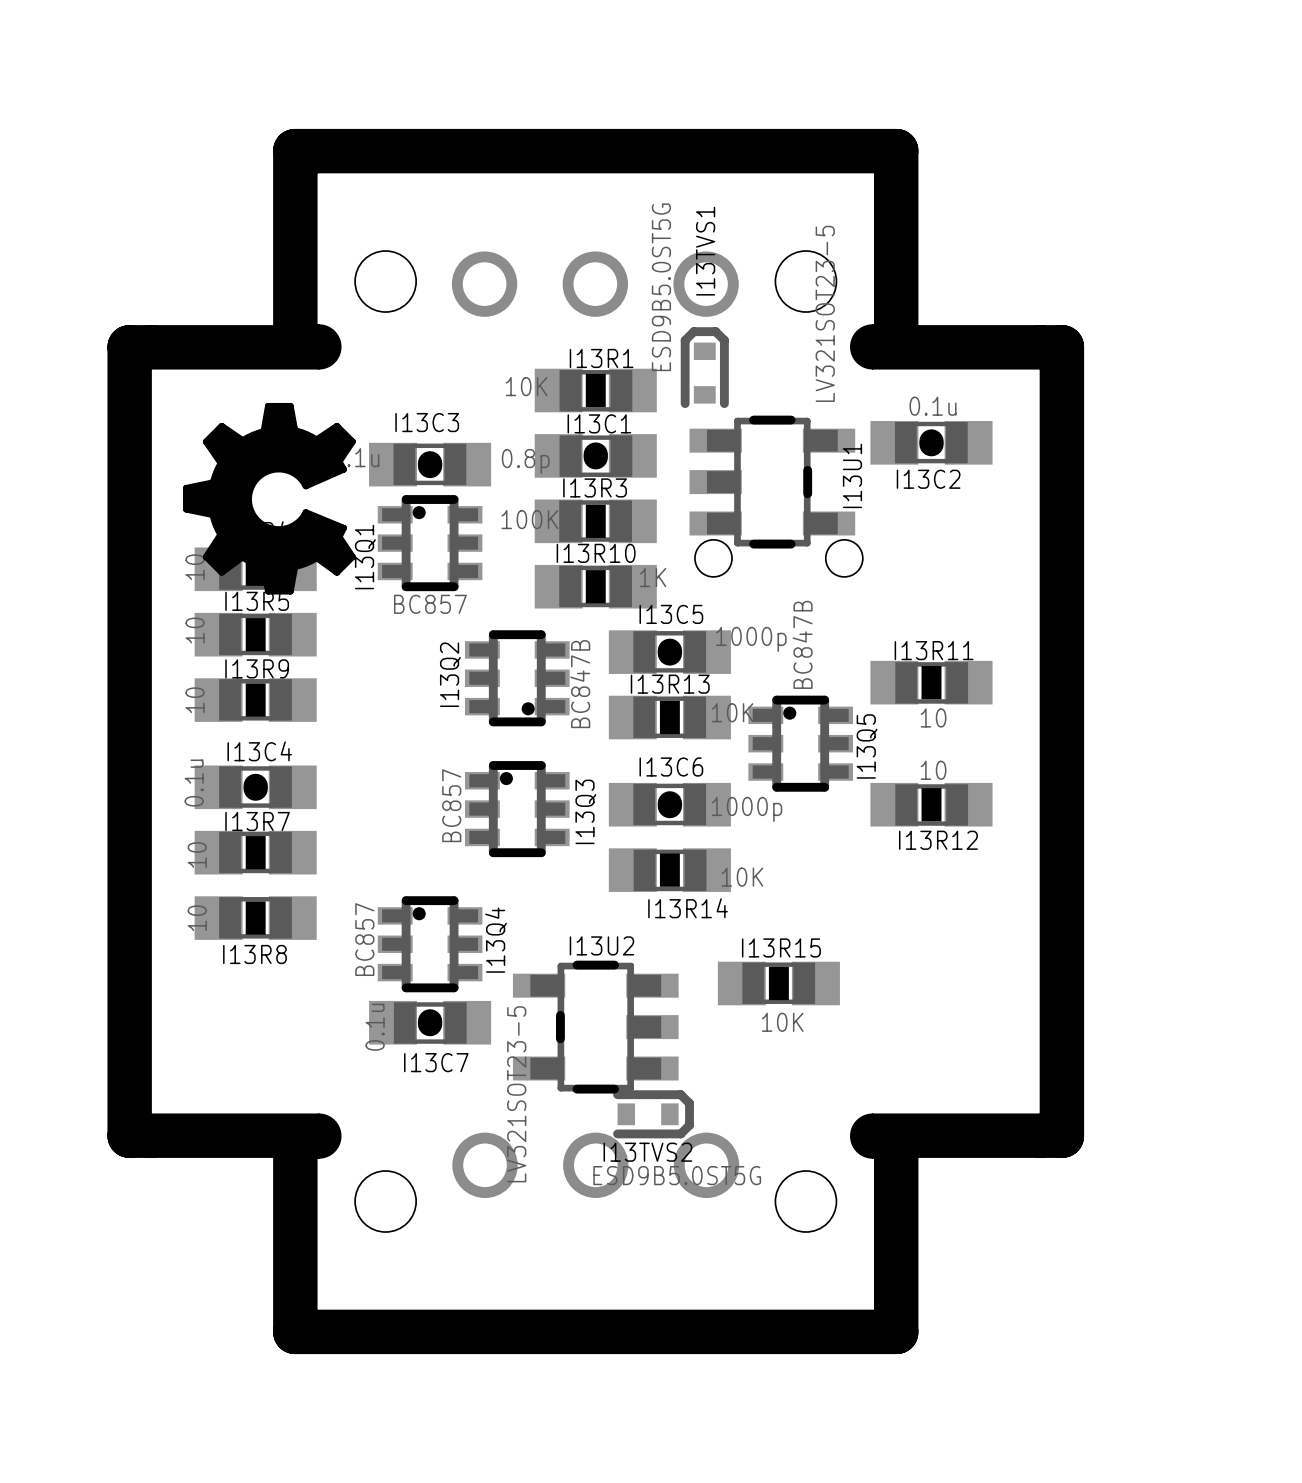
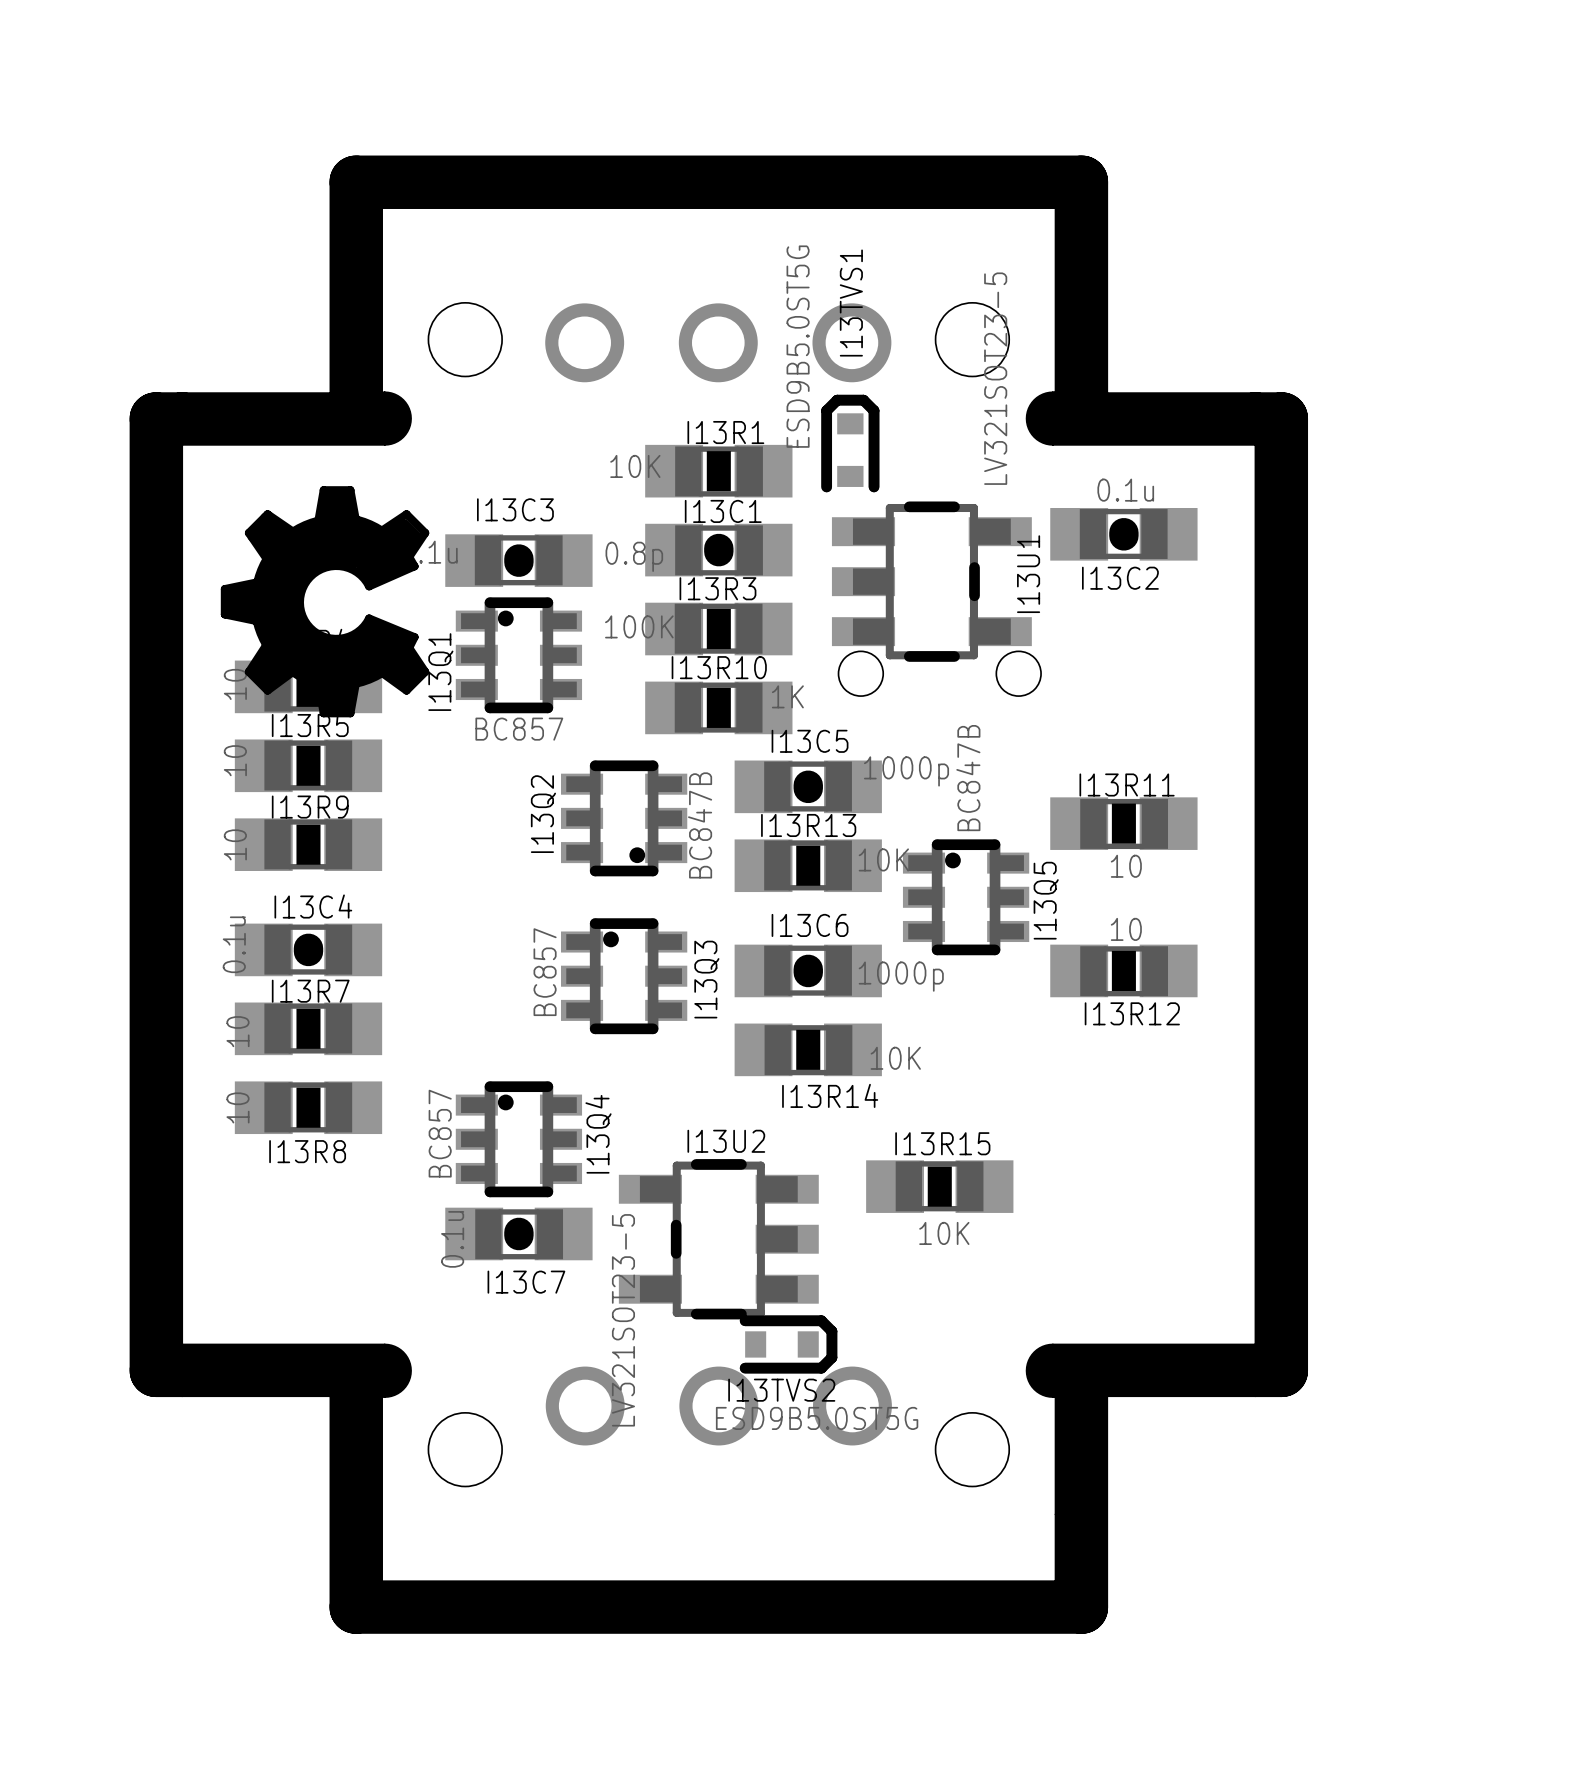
I13TVS1 footprint: [680, 327, 729, 409] -> [821, 394, 880, 493]
I13TVS2 footprint: [613, 1090, 694, 1139] -> [739, 1315, 838, 1374]

